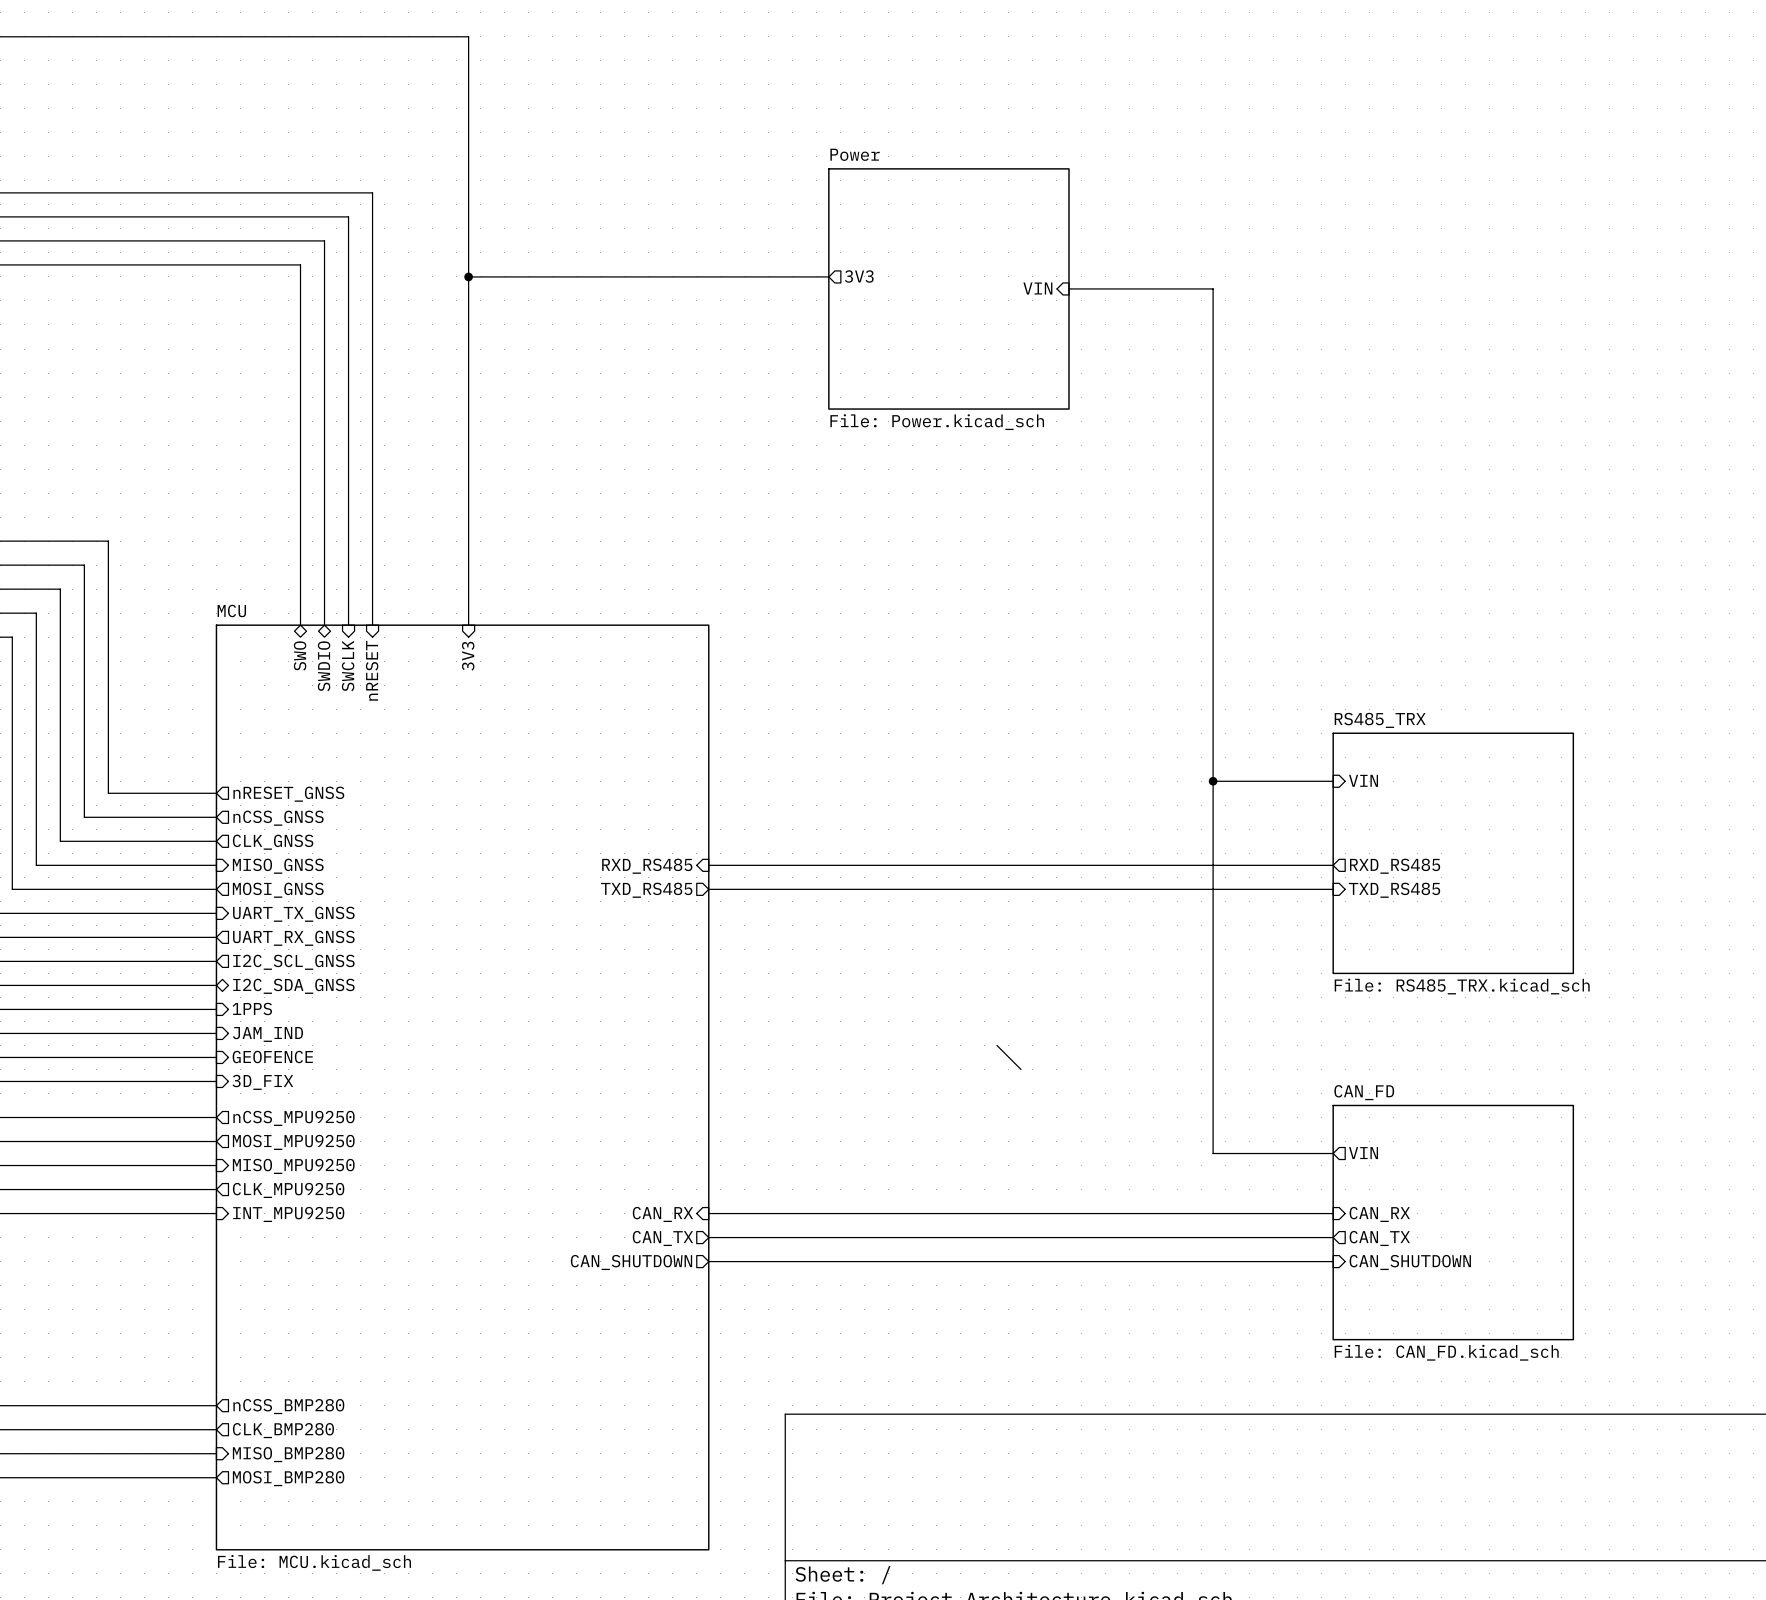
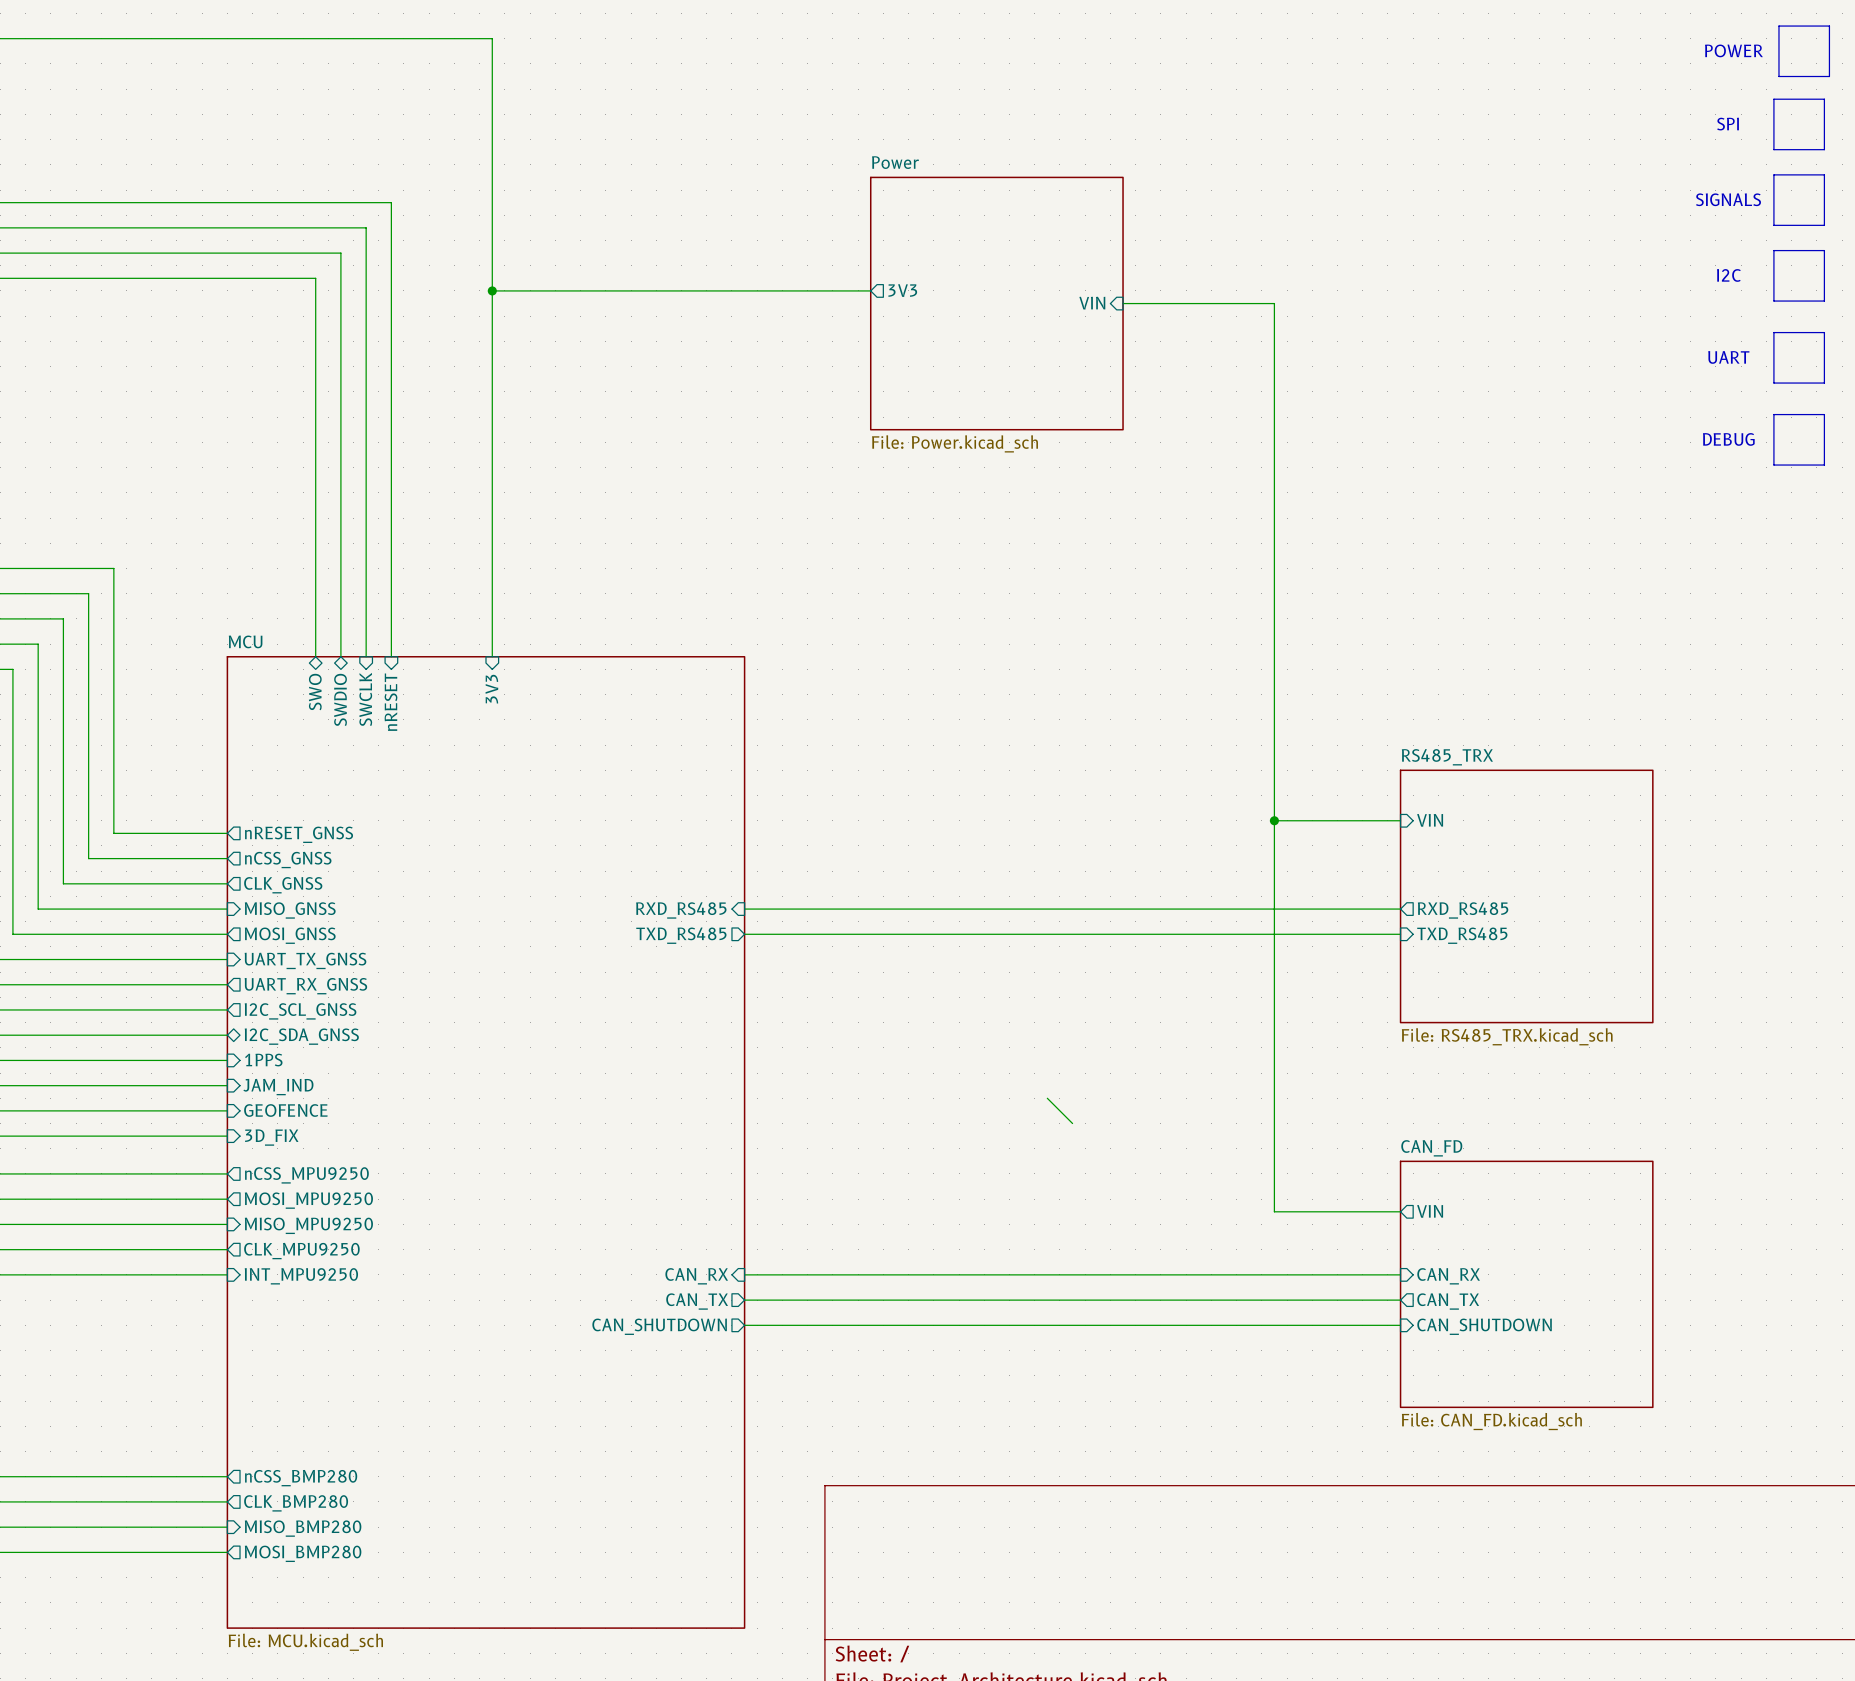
line: none -> (1778, 26) (1829, 26) (1829, 76) (1778, 76) (1778, 26)
text: none -> POWER (1733, 50)
line: none -> (1773, 99) (1773, 149) (1824, 149) (1824, 99) (1773, 99)
text: none -> SPI (1728, 124)
line: none -> (1773, 174) (1773, 225) (1824, 225) (1824, 174) (1773, 174)
text: none -> SIGNALS (1728, 199)
line: none -> (1773, 250) (1824, 250) (1824, 301) (1773, 301) (1773, 250)
text: none -> I2C (1728, 275)
line: none -> (1773, 332) (1773, 383) (1824, 383) (1824, 332) (1773, 332)
text: none -> UART (1728, 357)
line: none -> (1773, 414) (1773, 465) (1824, 465) (1824, 414) (1773, 414)
text: none -> DEBUG (1728, 439)

